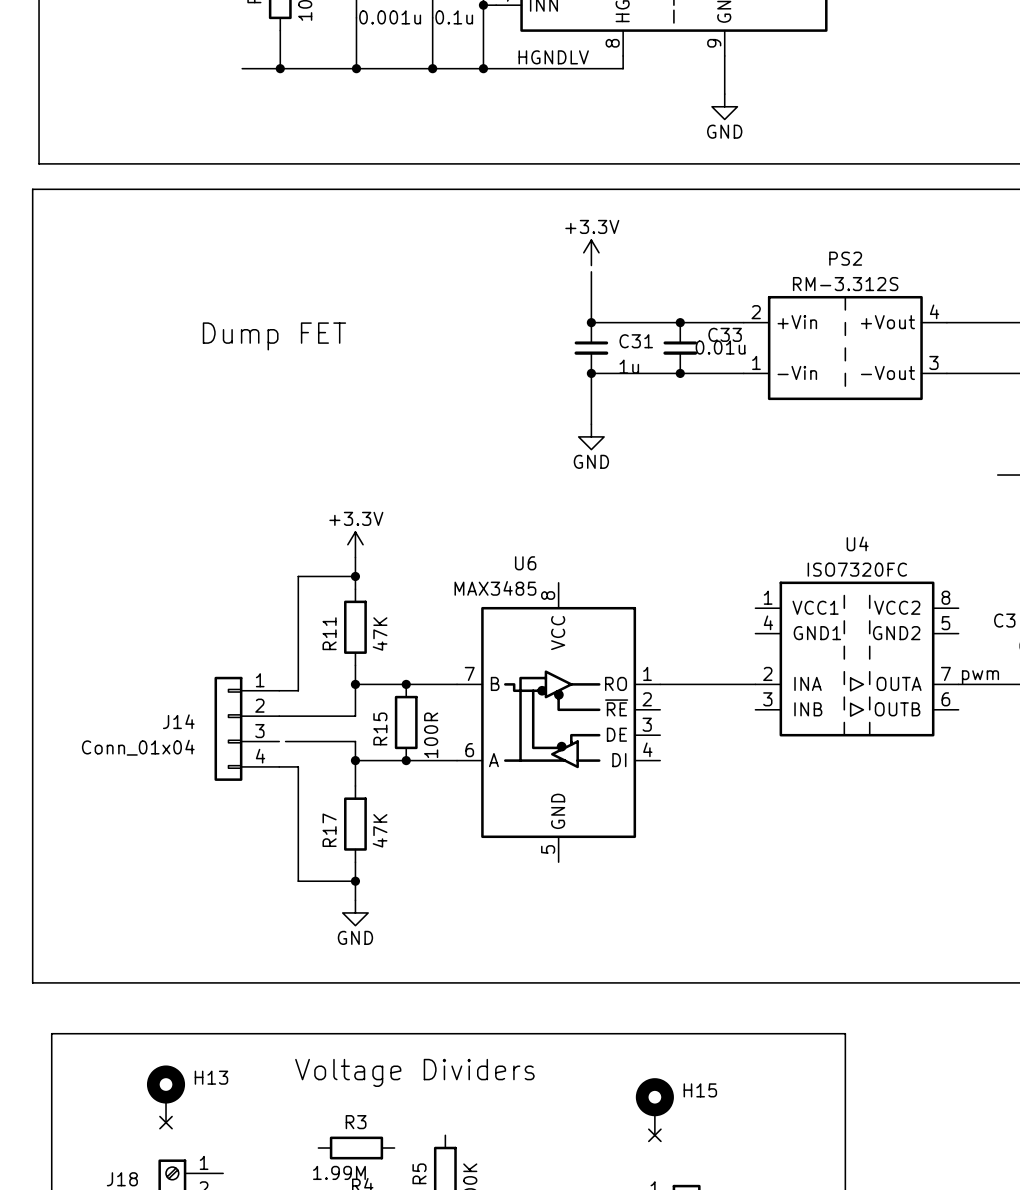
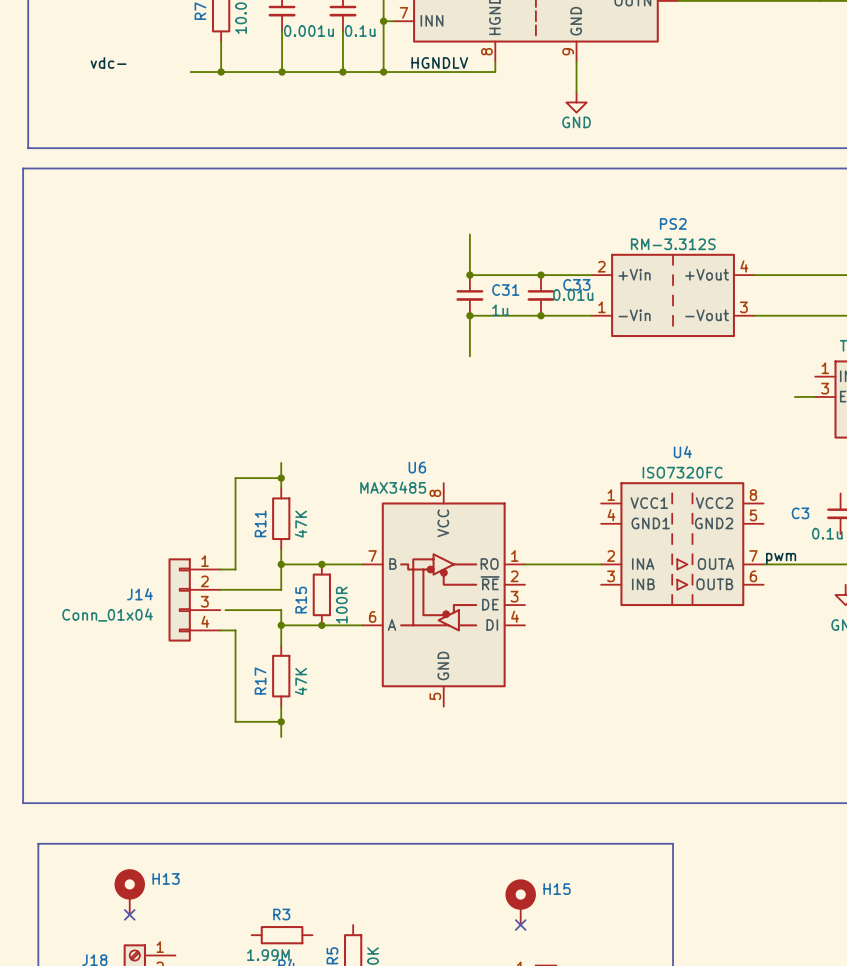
label: none -> vdc- (108, 62)
power symbol: +3.3V (591, 252) -> none
text: Dump FET (274, 336) -> none
power symbol: GND (591, 436) -> none
power symbol: +3.3V (355, 544) -> none
power symbol: GND (355, 912) -> none
text: Voltage Dividers (414, 1072) -> none

